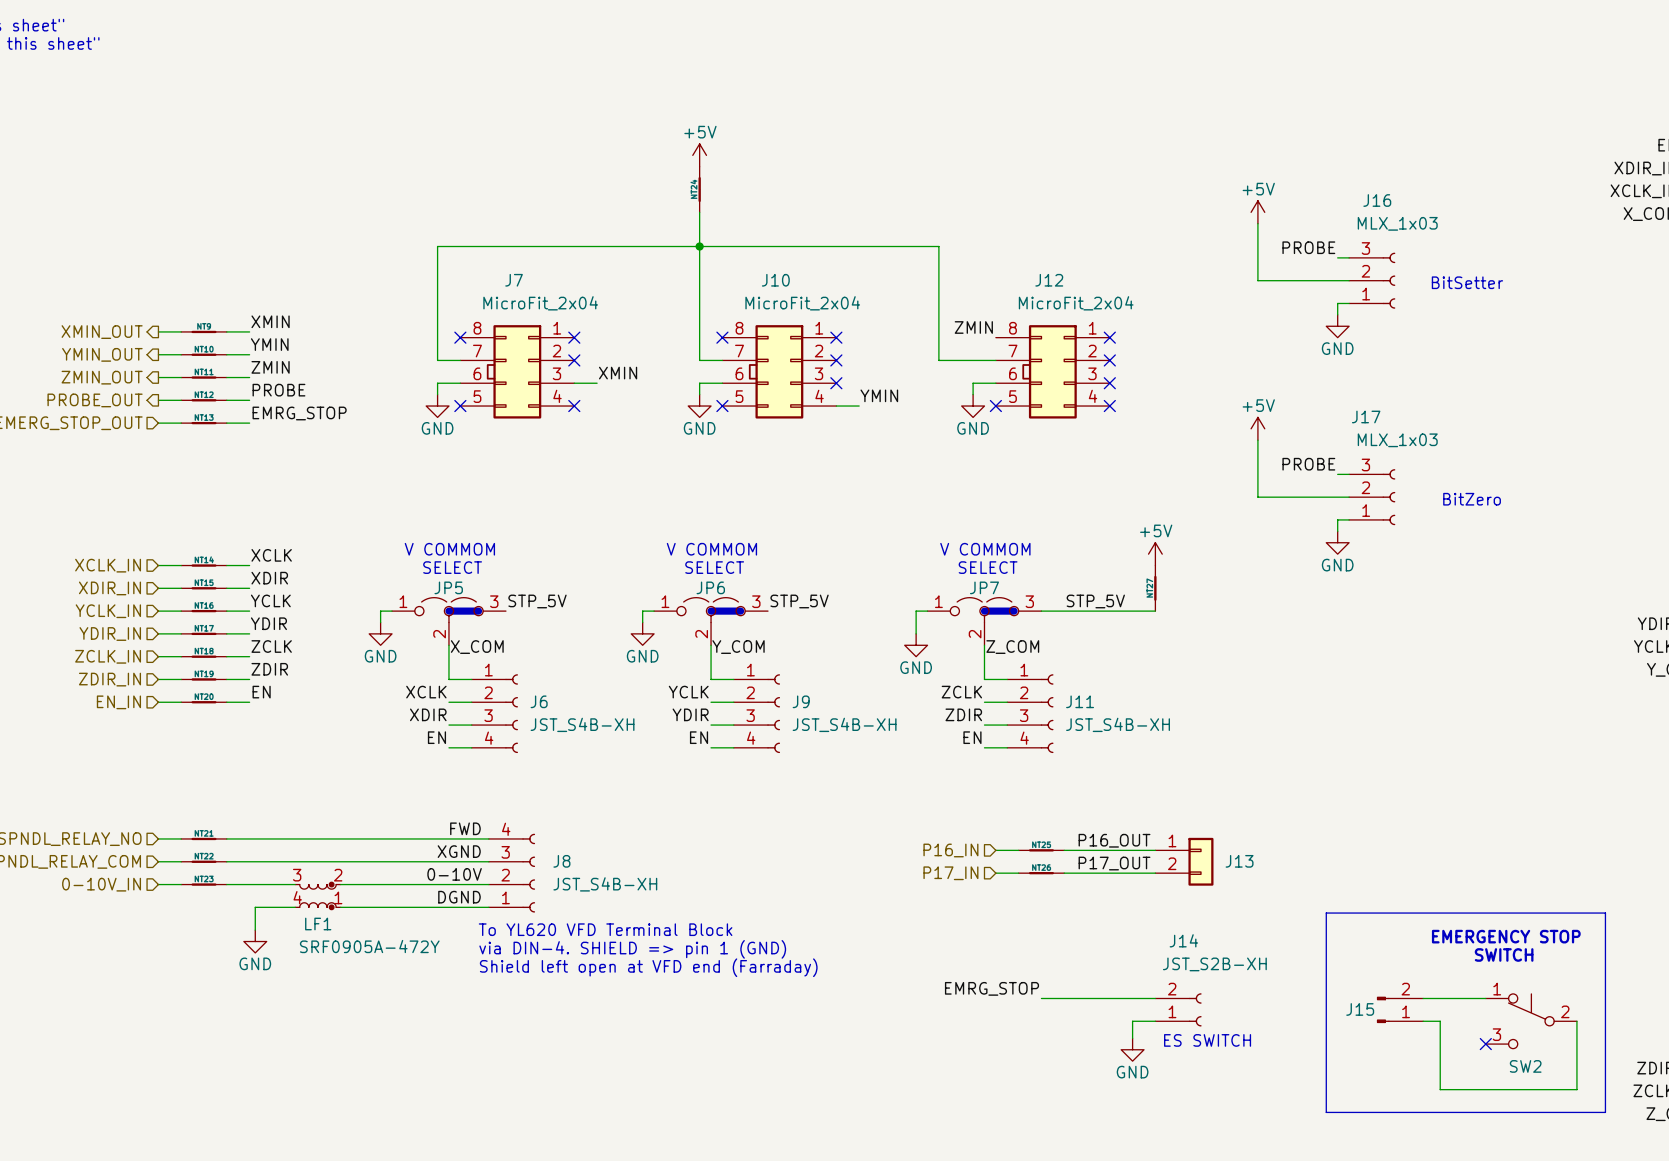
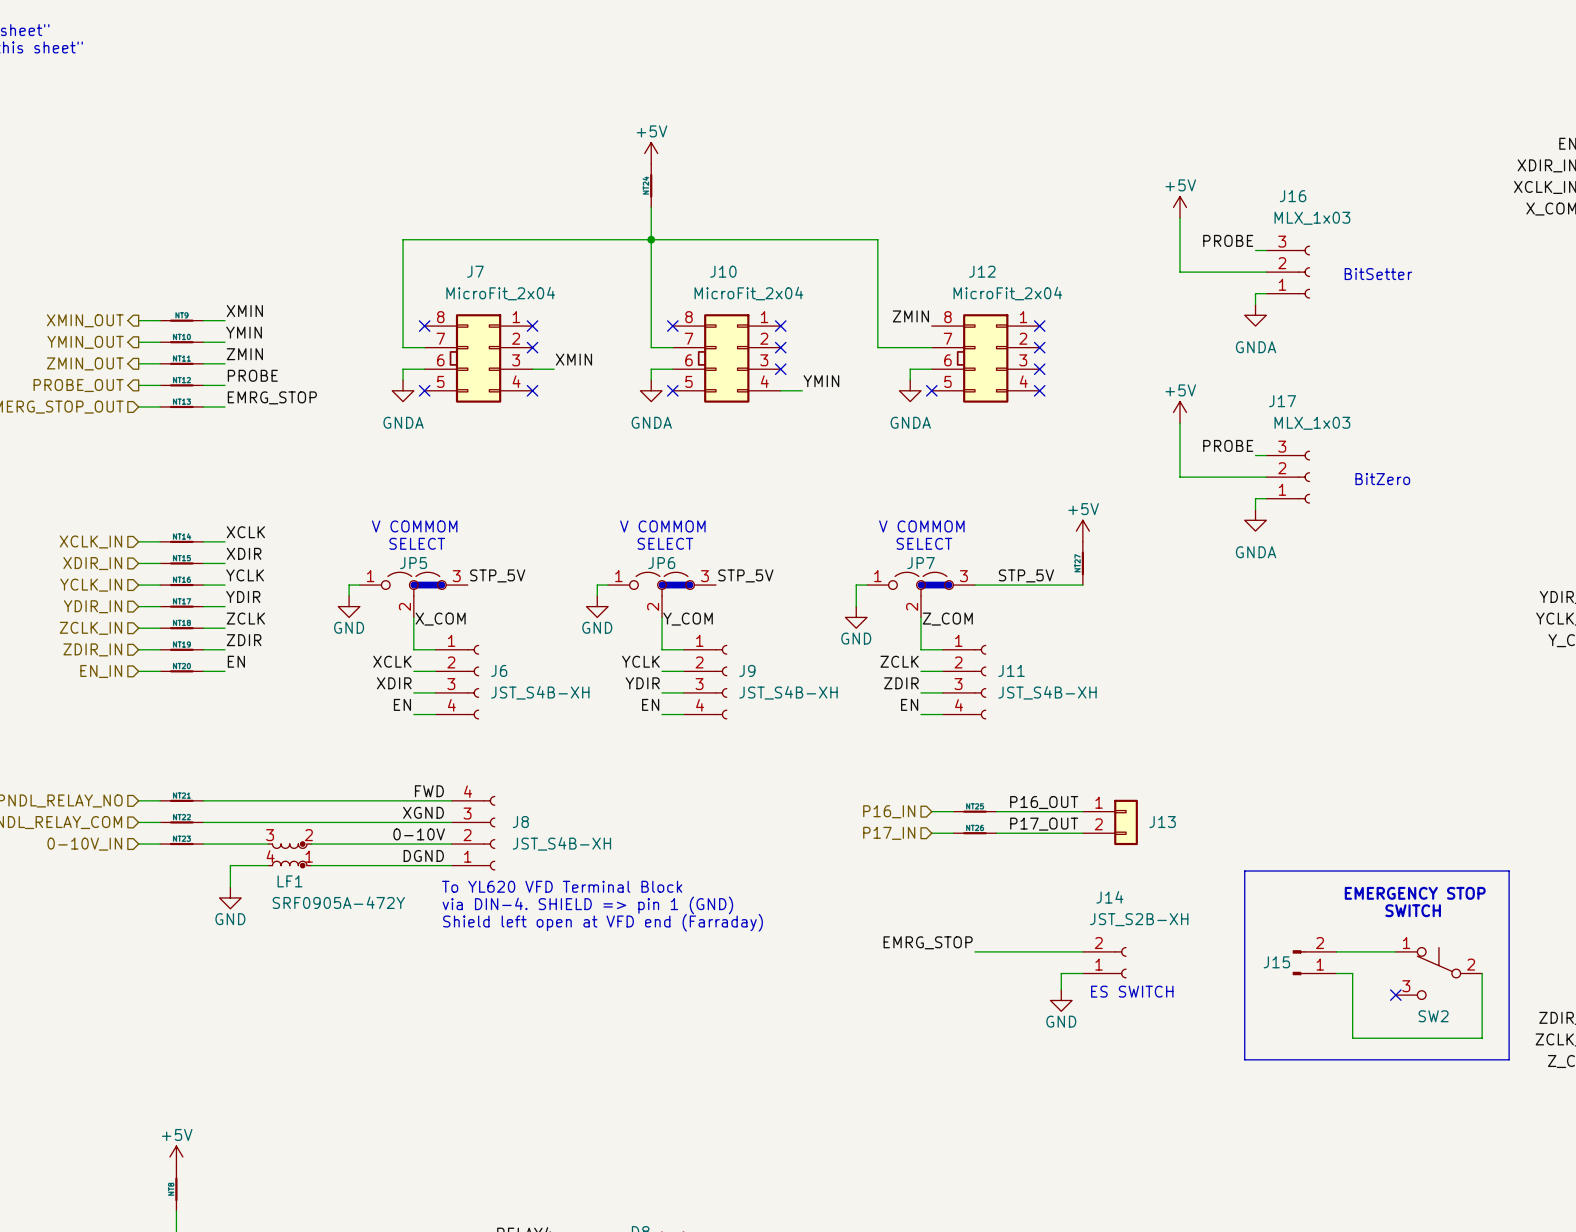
power symbol: GND (1337, 326) -> GNDA (1255, 315)
power symbol: GND (437, 406) -> GNDA (403, 390)
power symbol: GND (699, 406) -> GNDA (651, 390)
power symbol: GND (973, 406) -> GNDA (910, 390)
power symbol: GND (1337, 542) -> GNDA (1255, 520)

